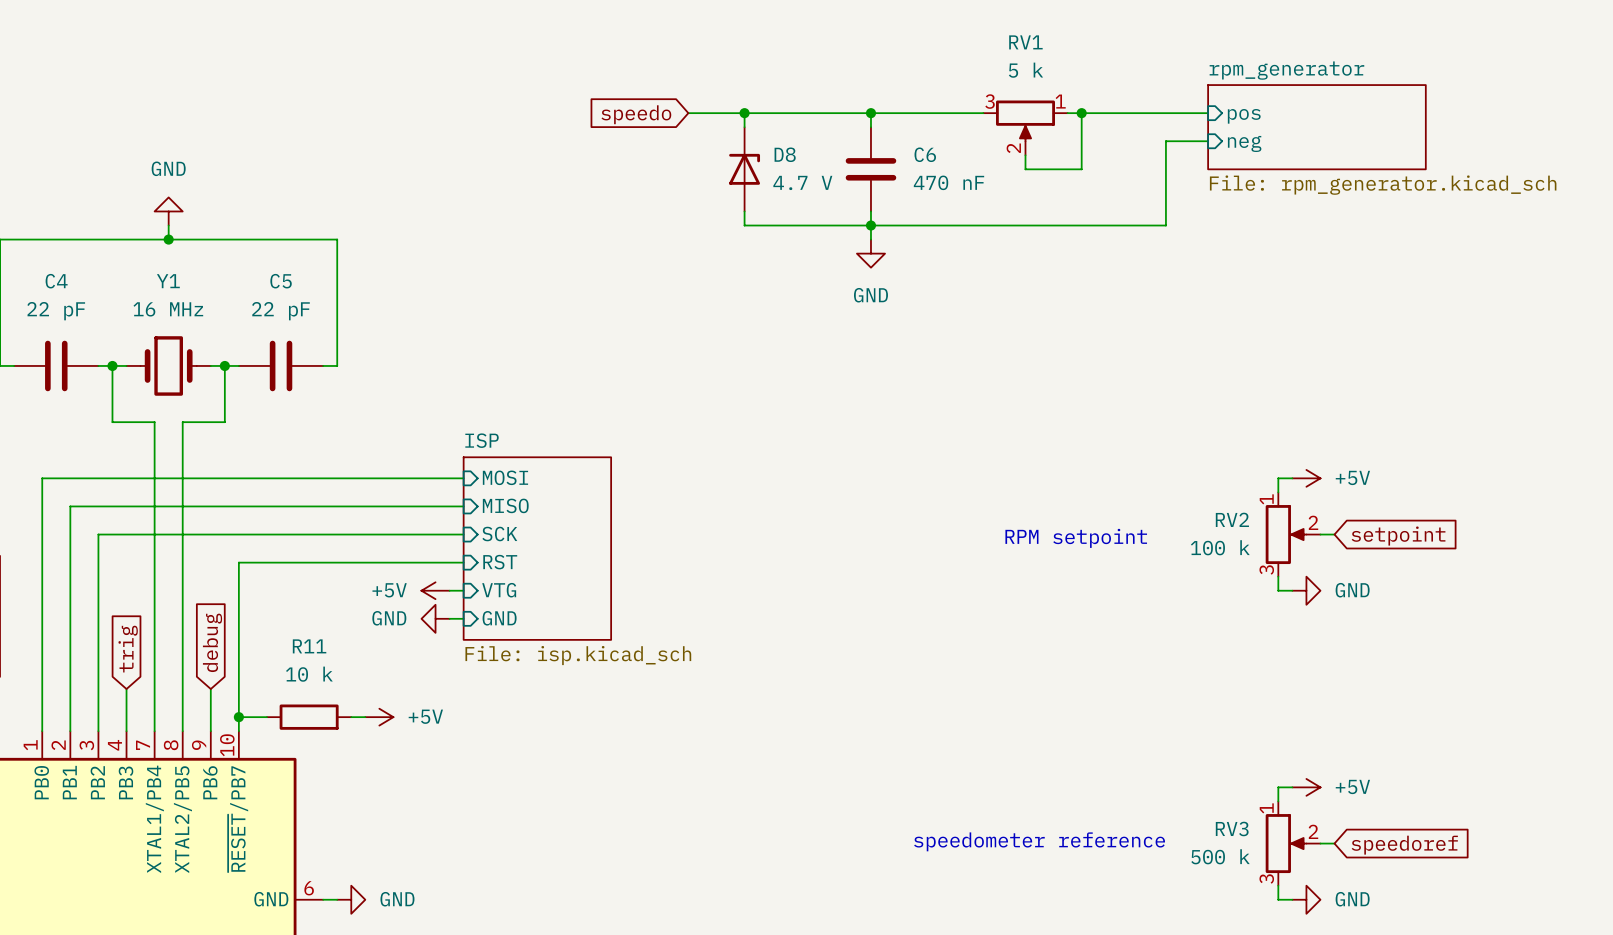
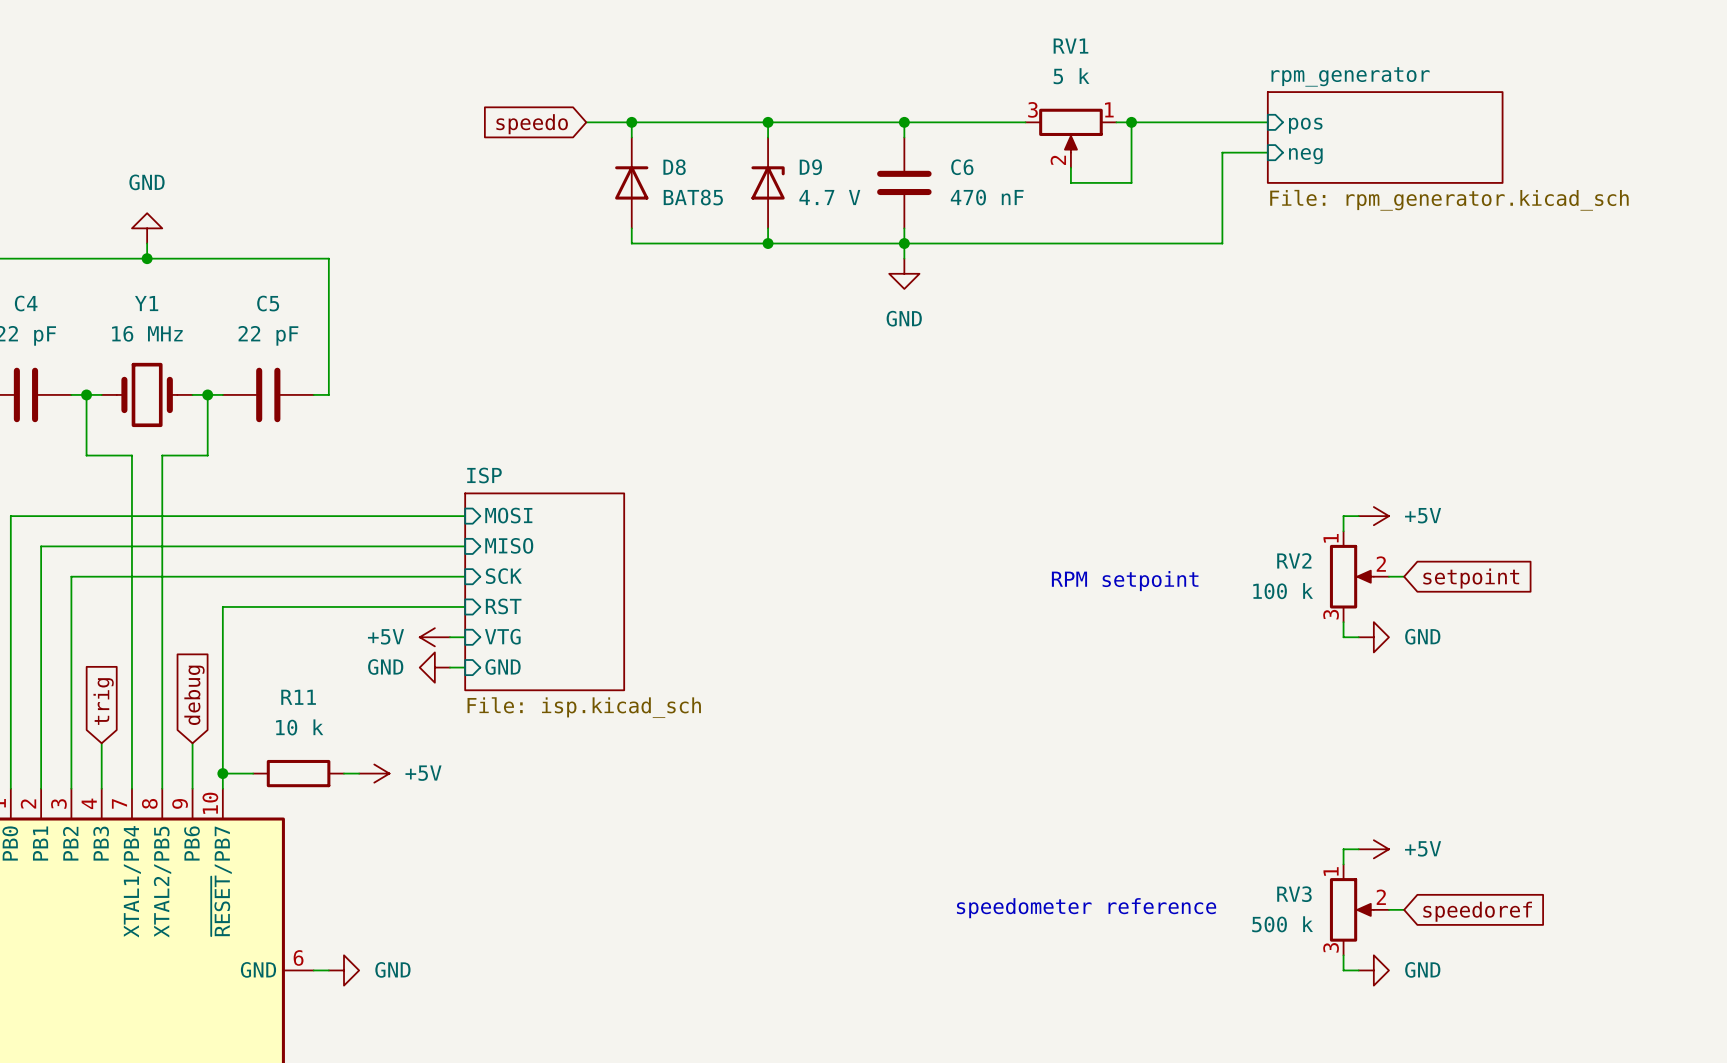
wire: none -> (586, 122) (707, 122)
junction: none -> (631, 122)
global label position: speedo (636, 114) -> speedo (532, 124)
D8 name: D8 (785, 154) -> D9 (810, 167)
D8: none -> BAT85 (631, 182)
wire: none -> (631, 228) (631, 243) (768, 243)
junction: none -> (768, 243)

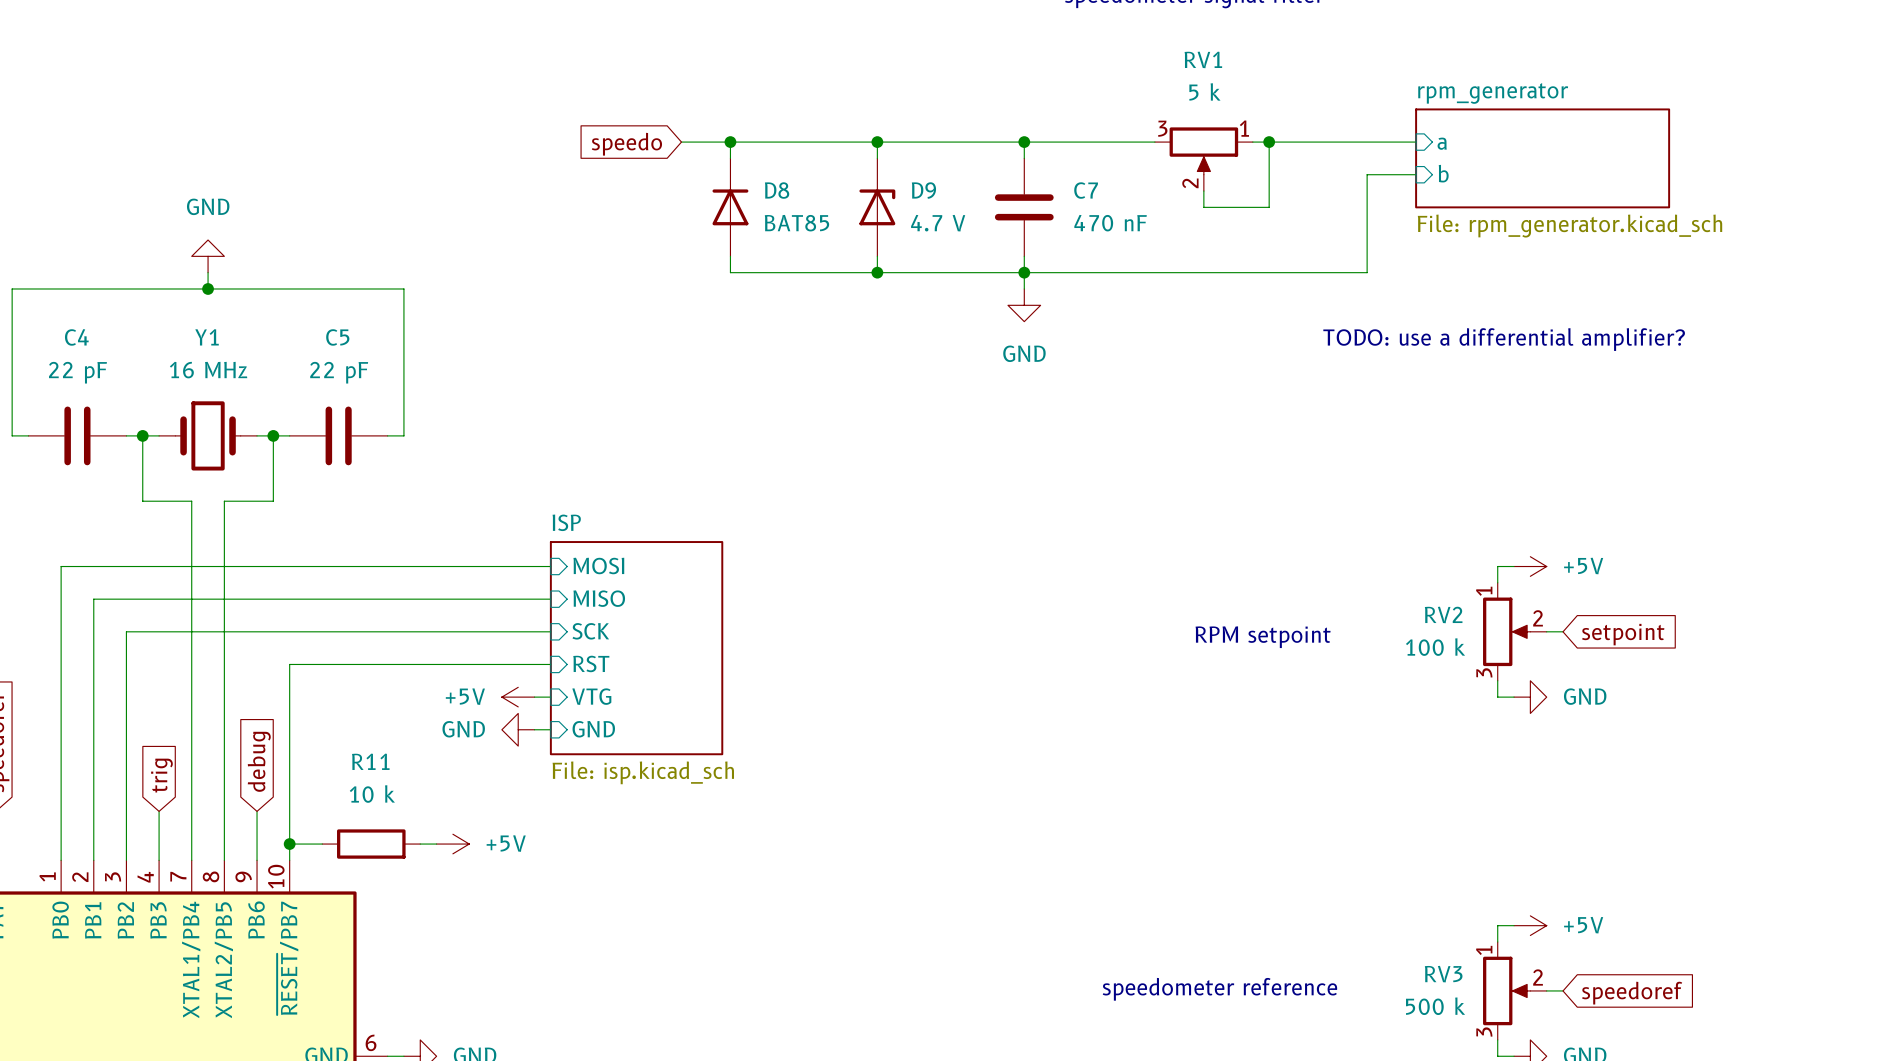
sheet pin: pos (1305, 125) -> a (1442, 143)
sheet pin: neg (1305, 156) -> b (1443, 173)
C6 name: C6 (962, 167) -> C7 (1086, 190)
text: none -> TODO: use a differential amplifier? (1504, 339)

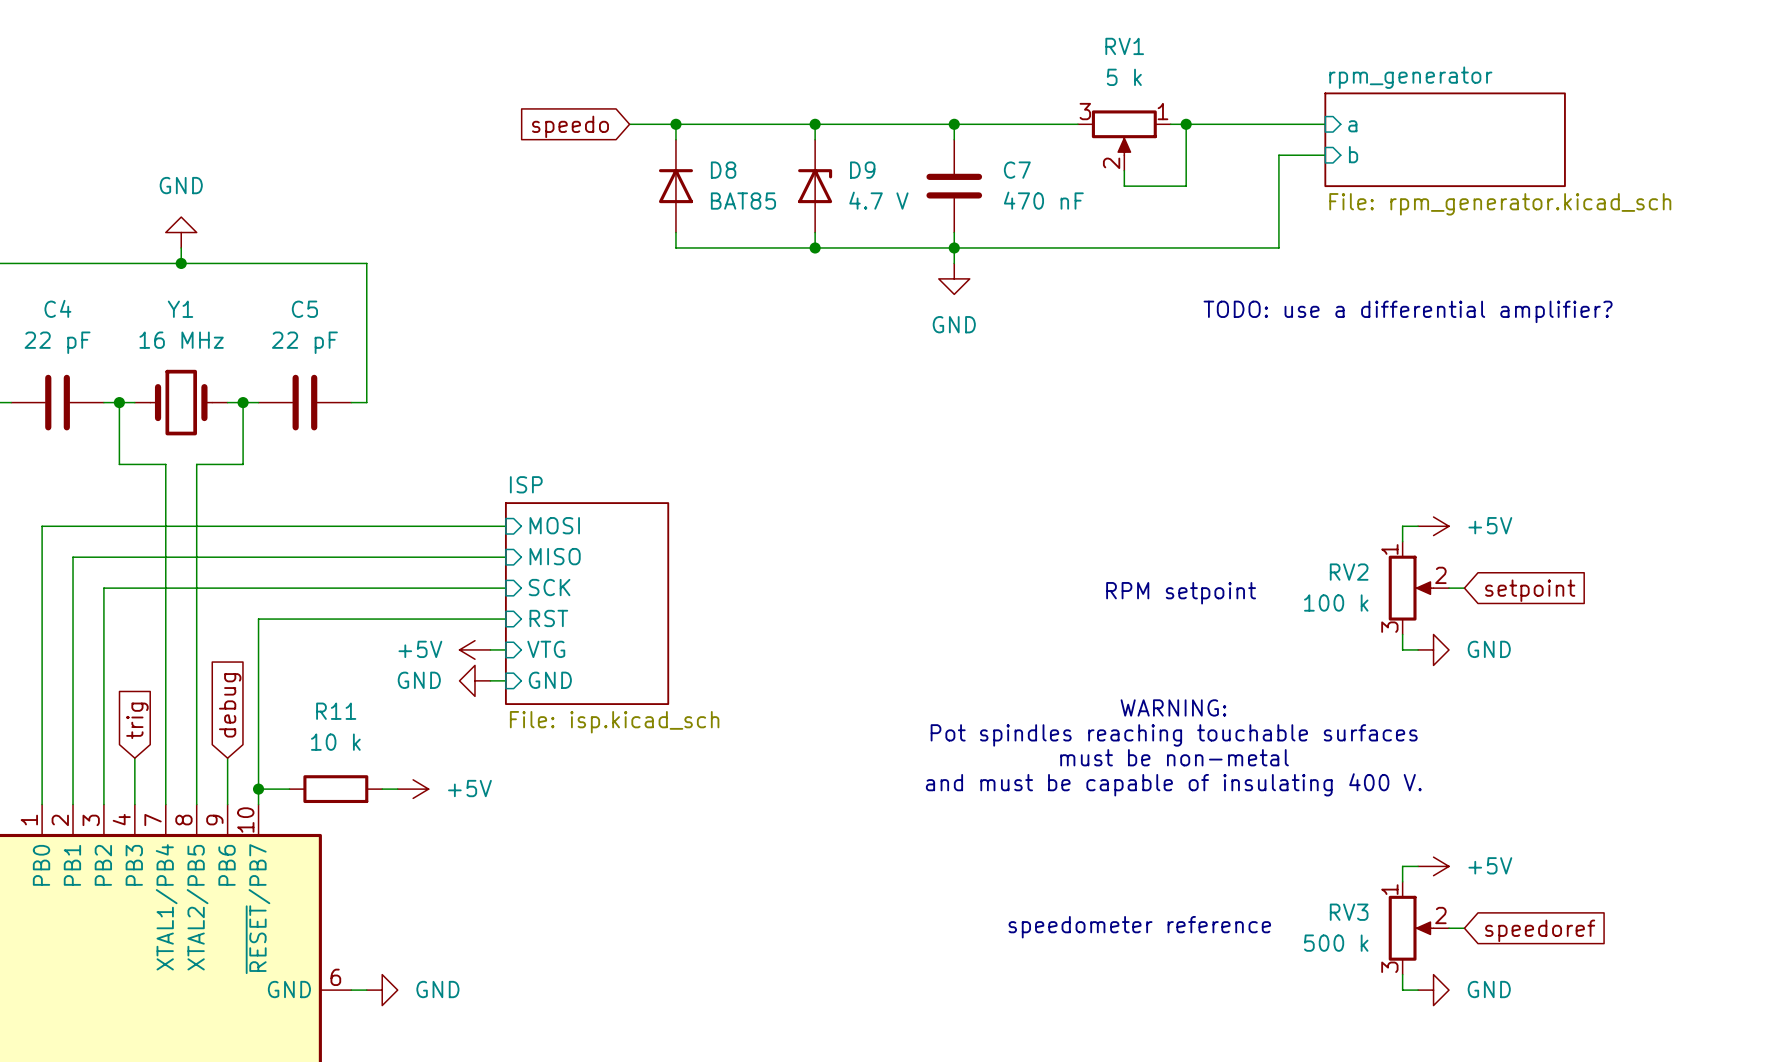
text: none -> WARNING: (1173, 707)
text: none -> Pot spindles reaching touchable surfaces (1174, 735)
text: none -> must be non-metal (1174, 757)
text: none -> and must be capable of insulating 400 V. (1173, 784)

